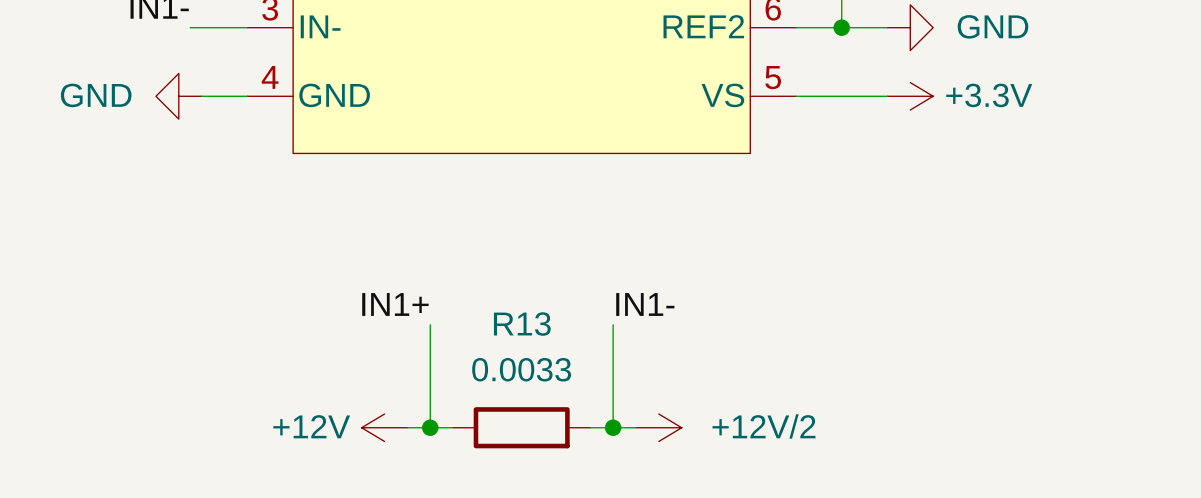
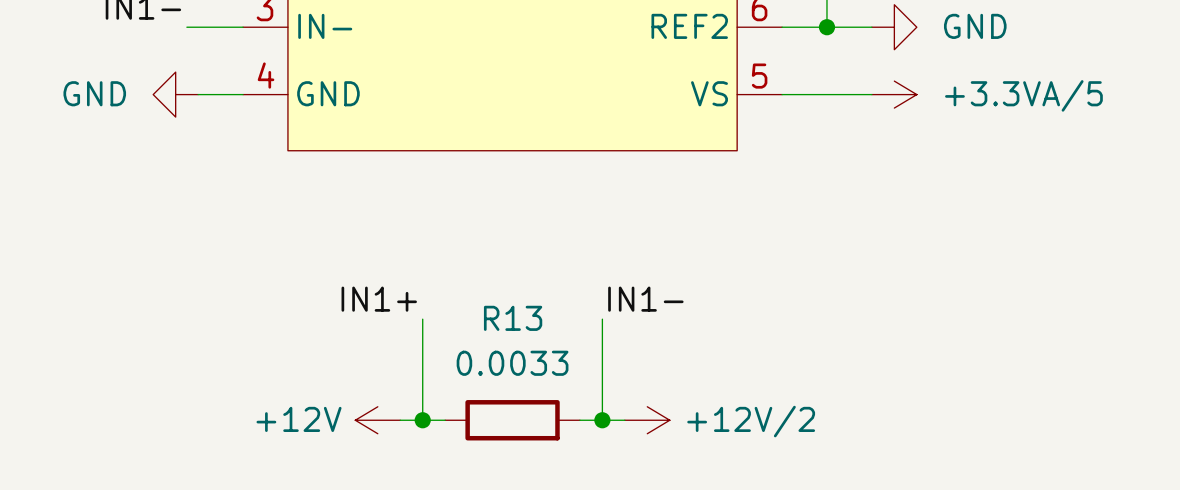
power symbol: +3.3V (910, 96) -> +3.3VA/5 (894, 94)

